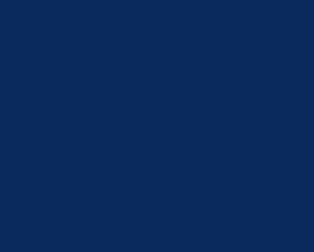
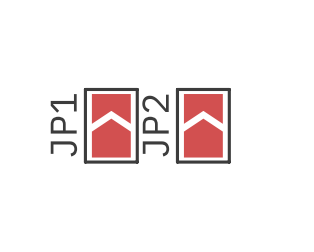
JP1: none -> (111, 125)
JP2: none -> (203, 125)

